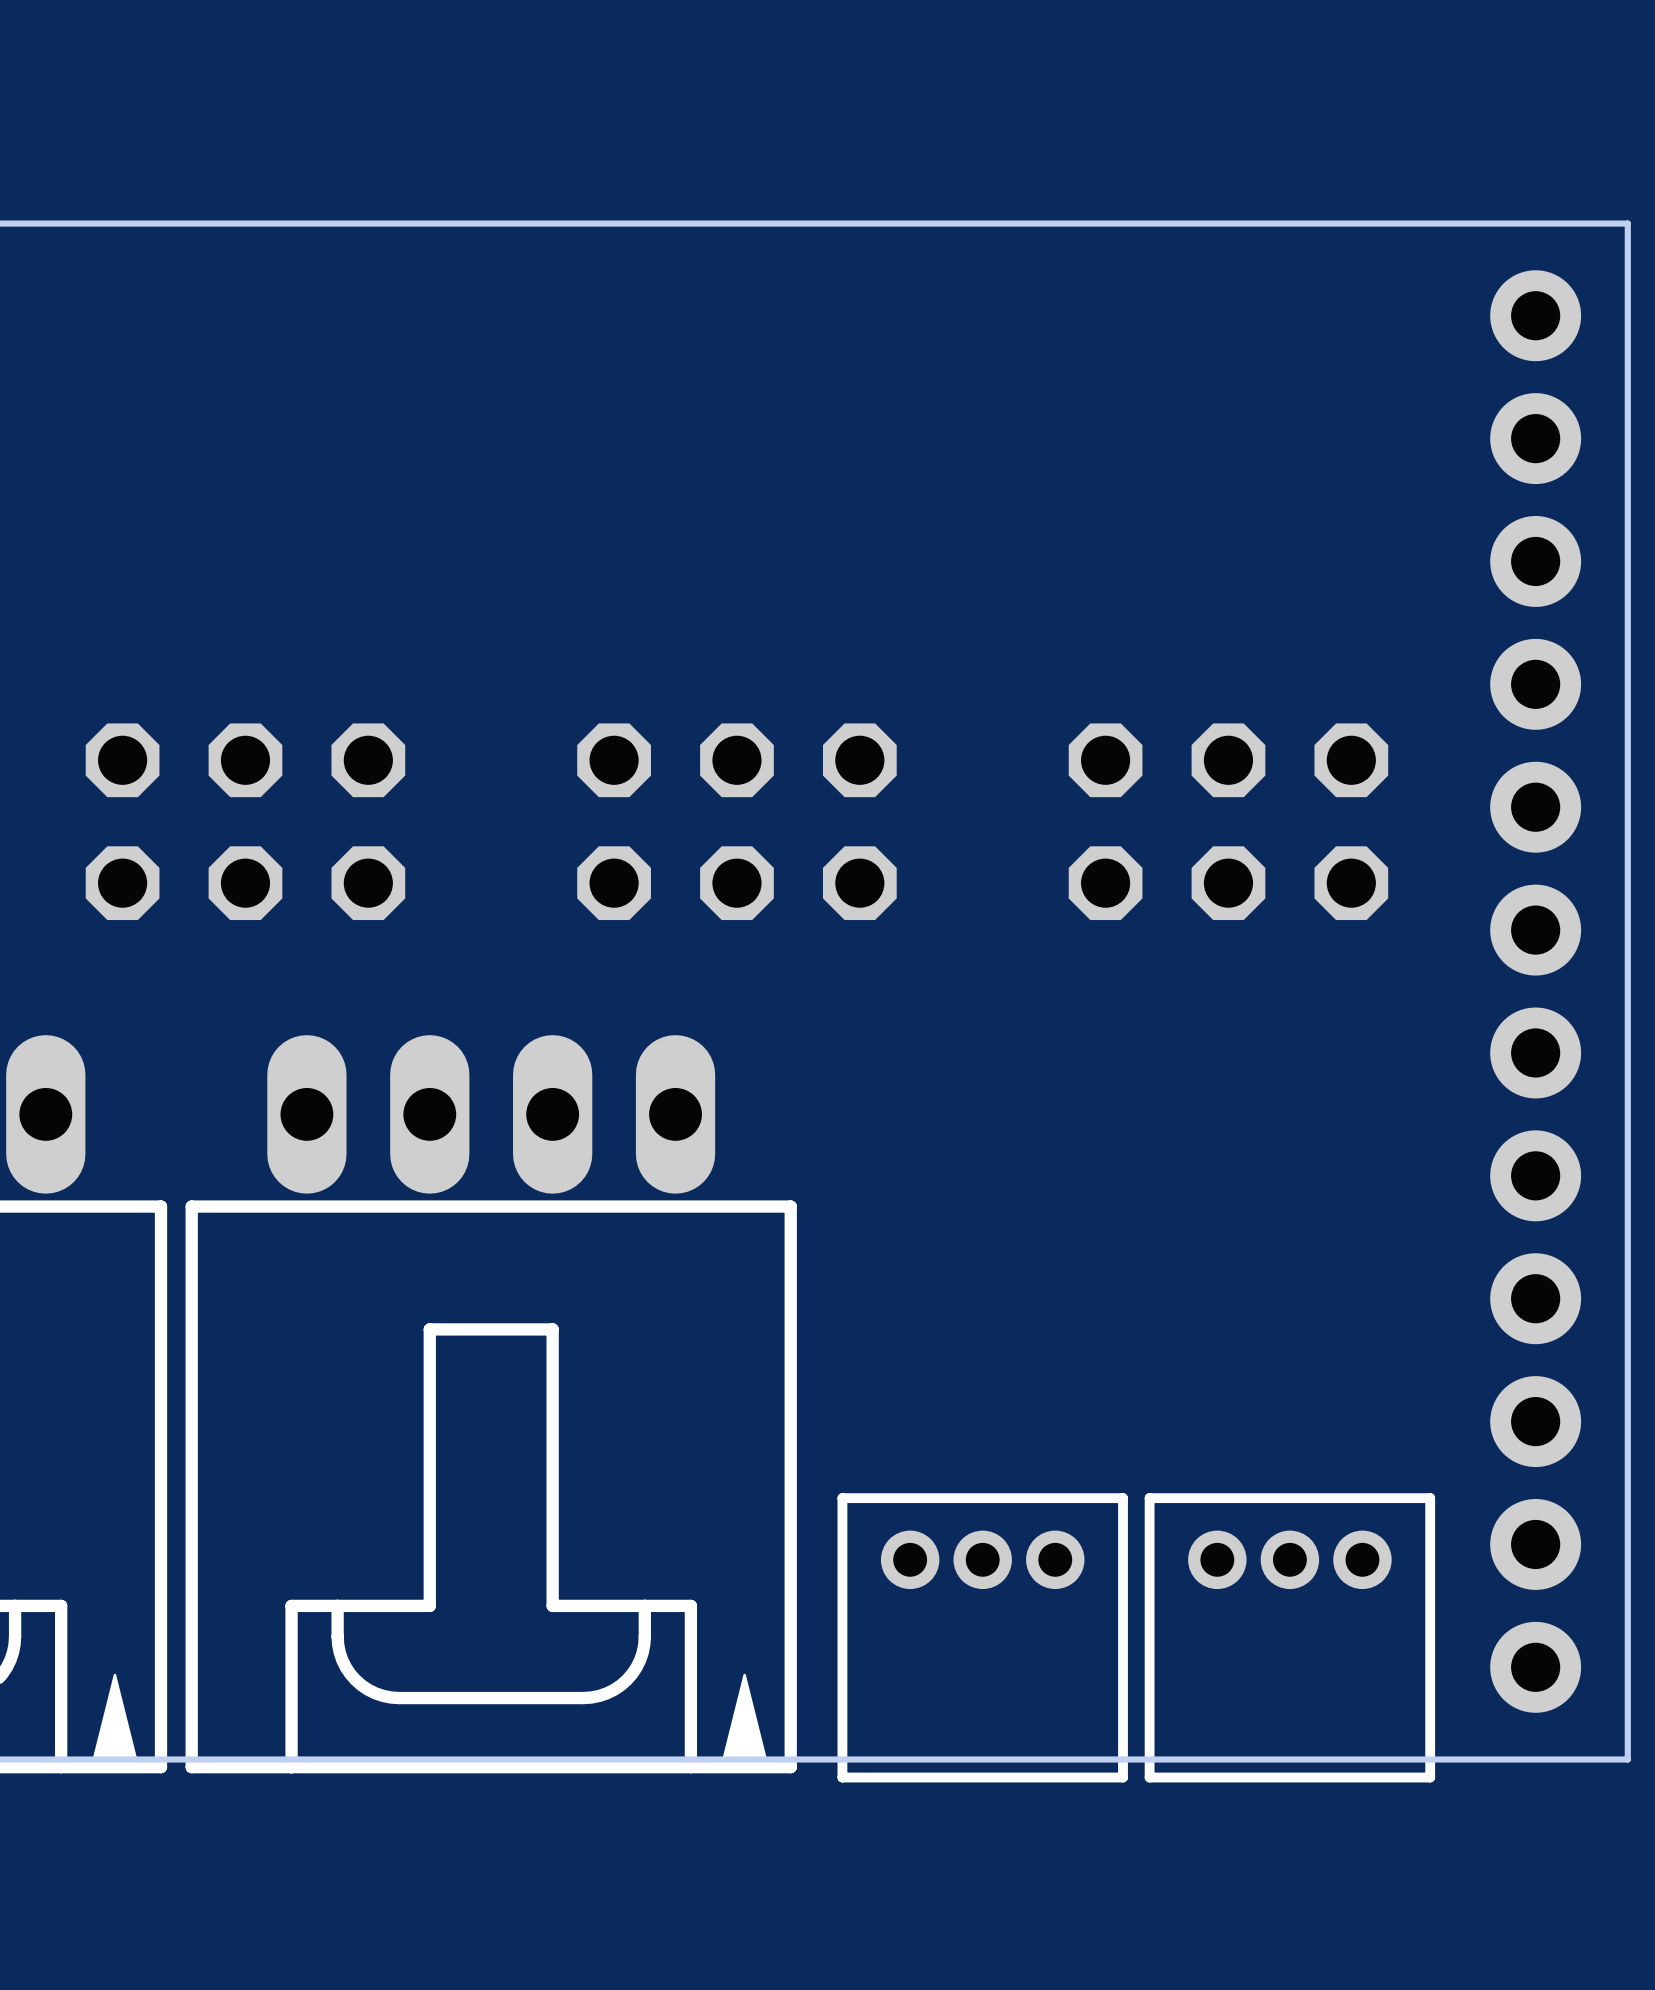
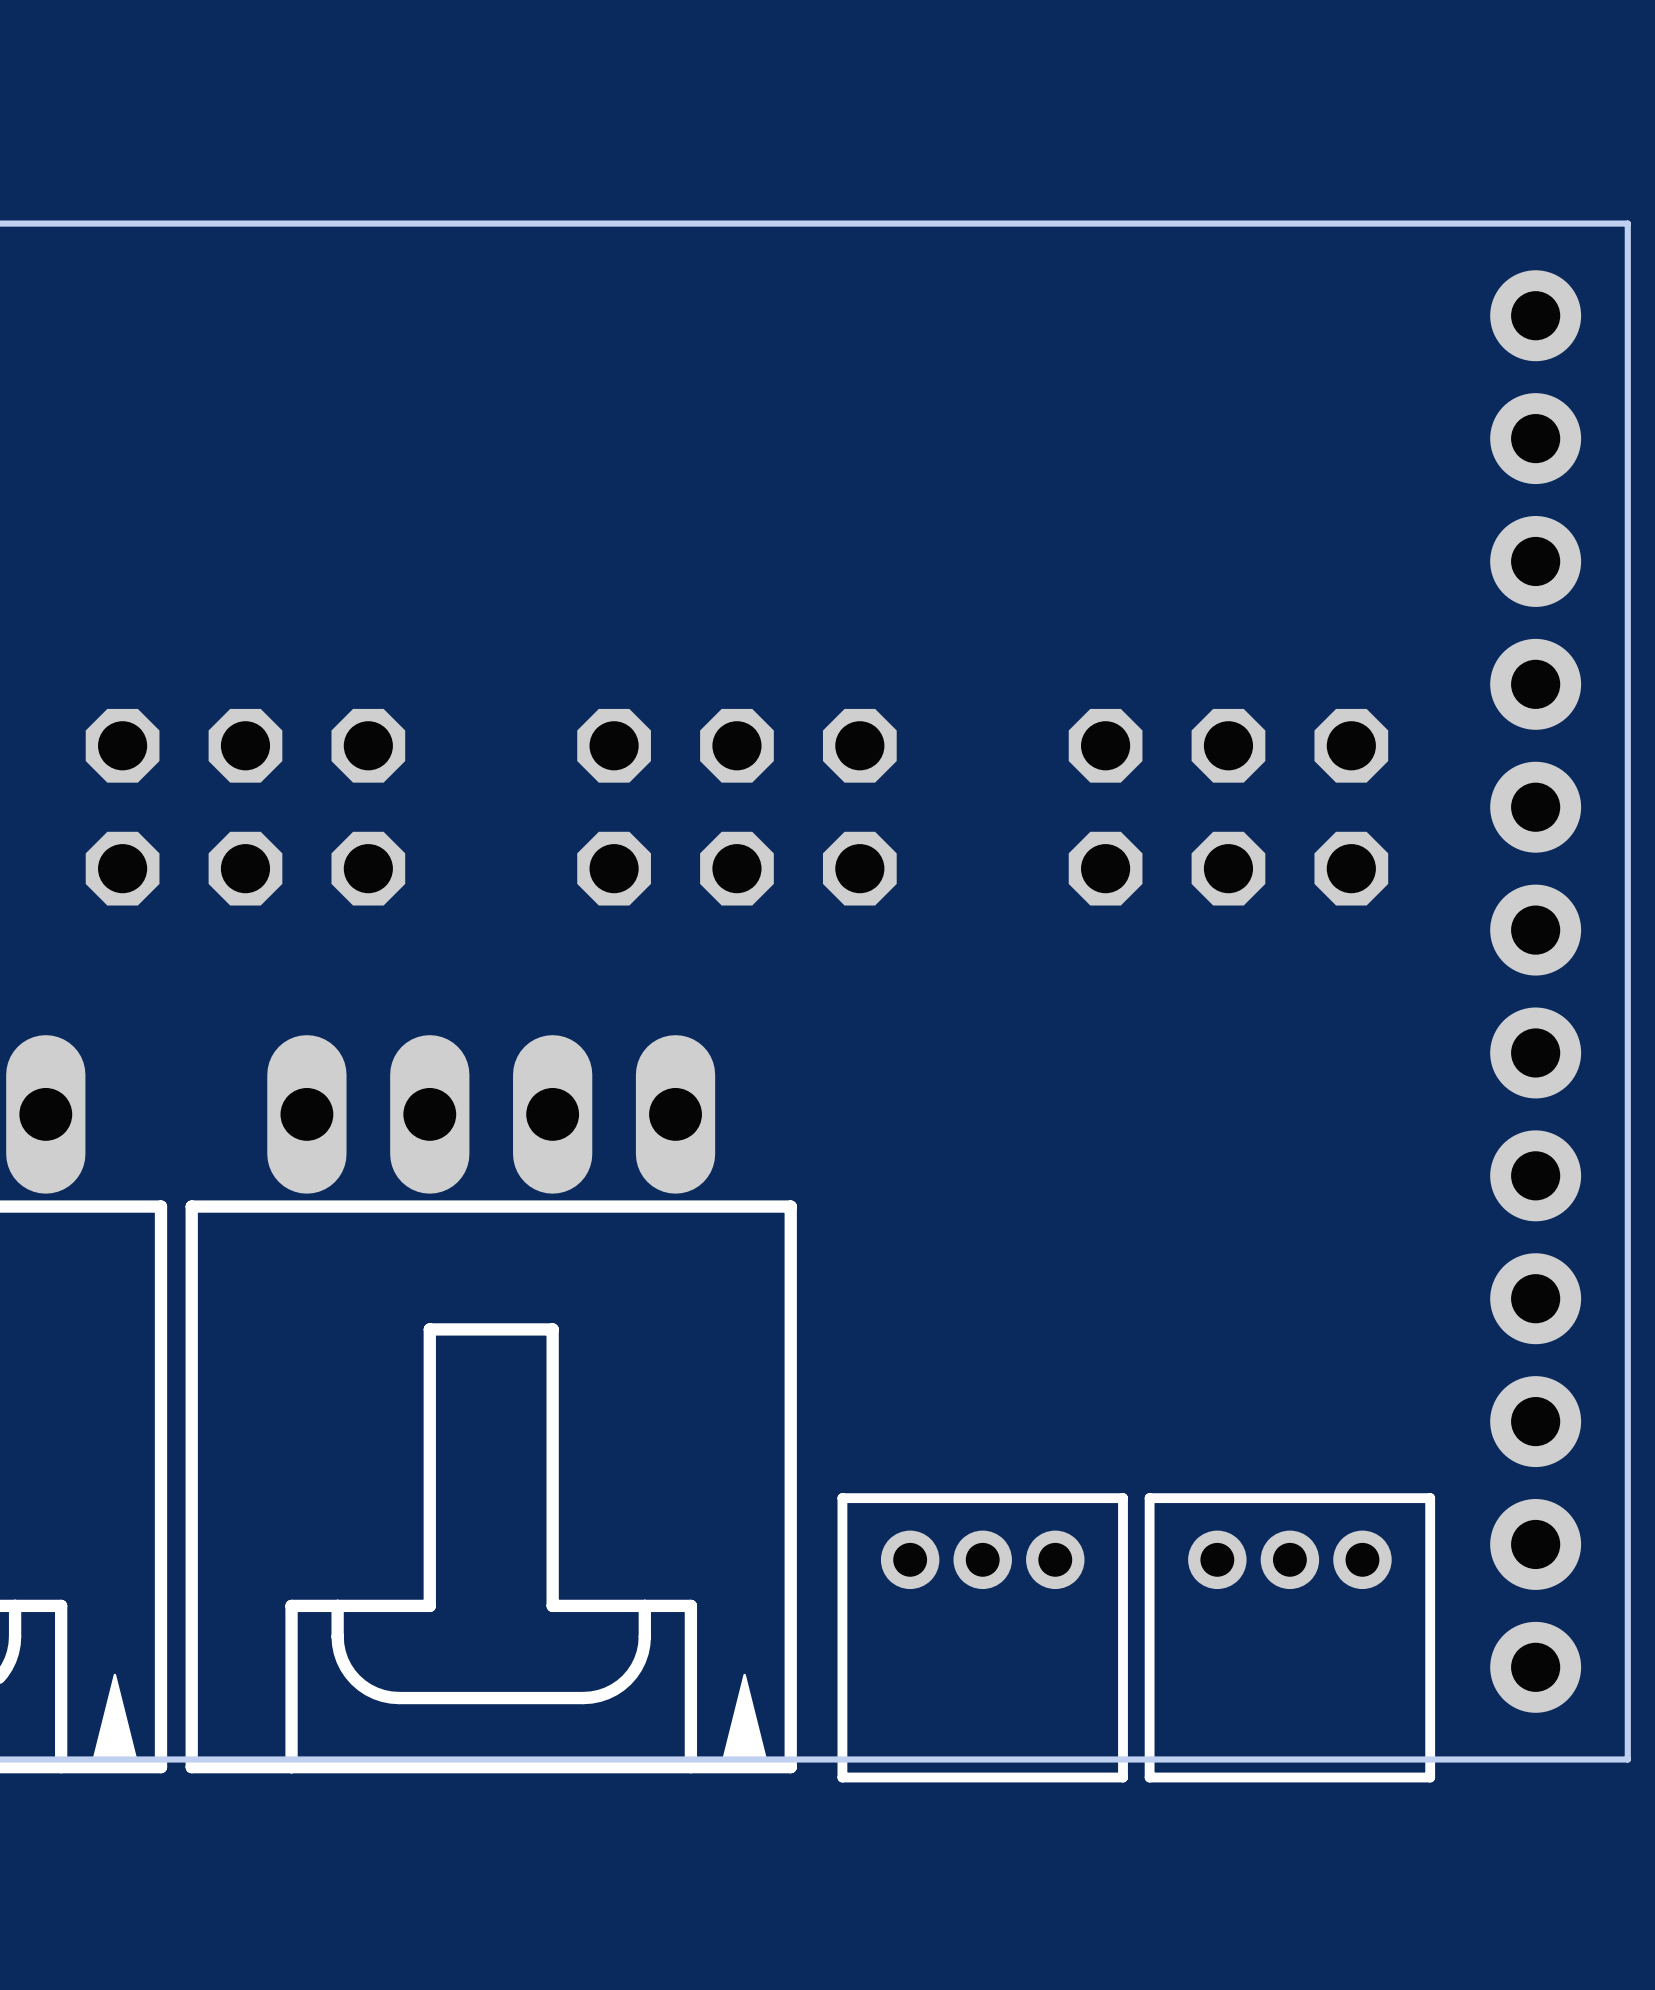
part position: (245, 821) -> (245, 807)
part position: (736, 821) -> (736, 807)
part position: (1228, 821) -> (1228, 807)

